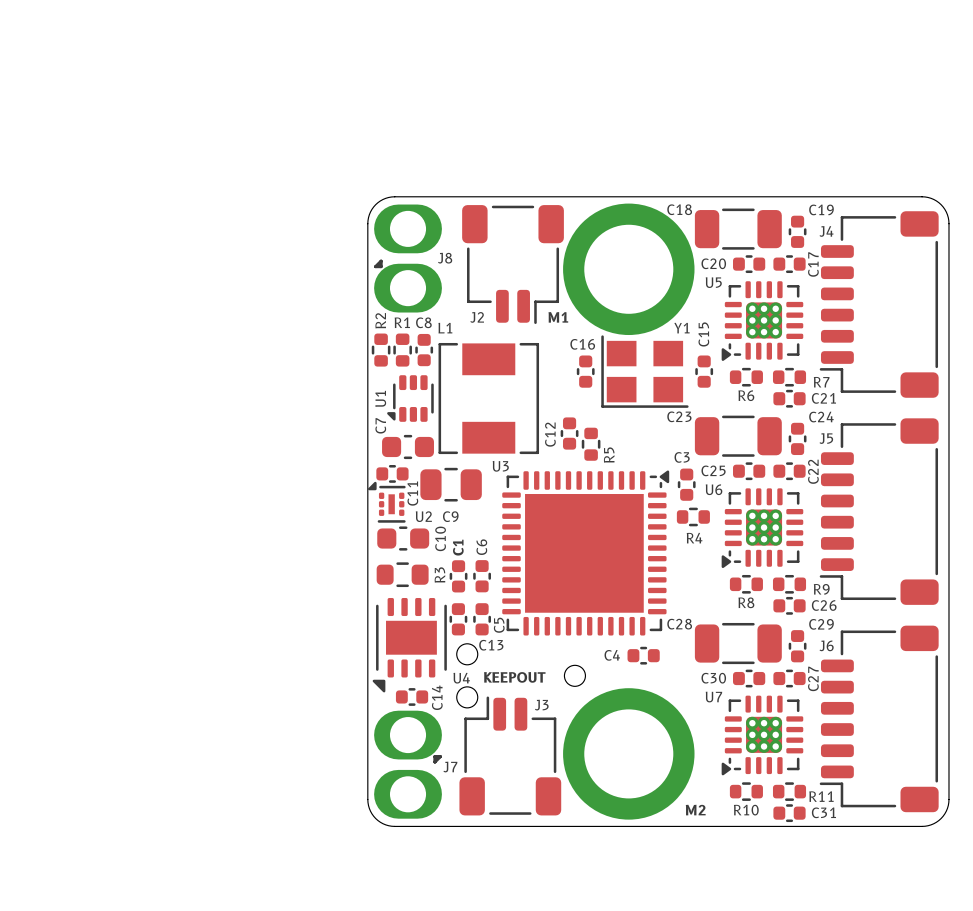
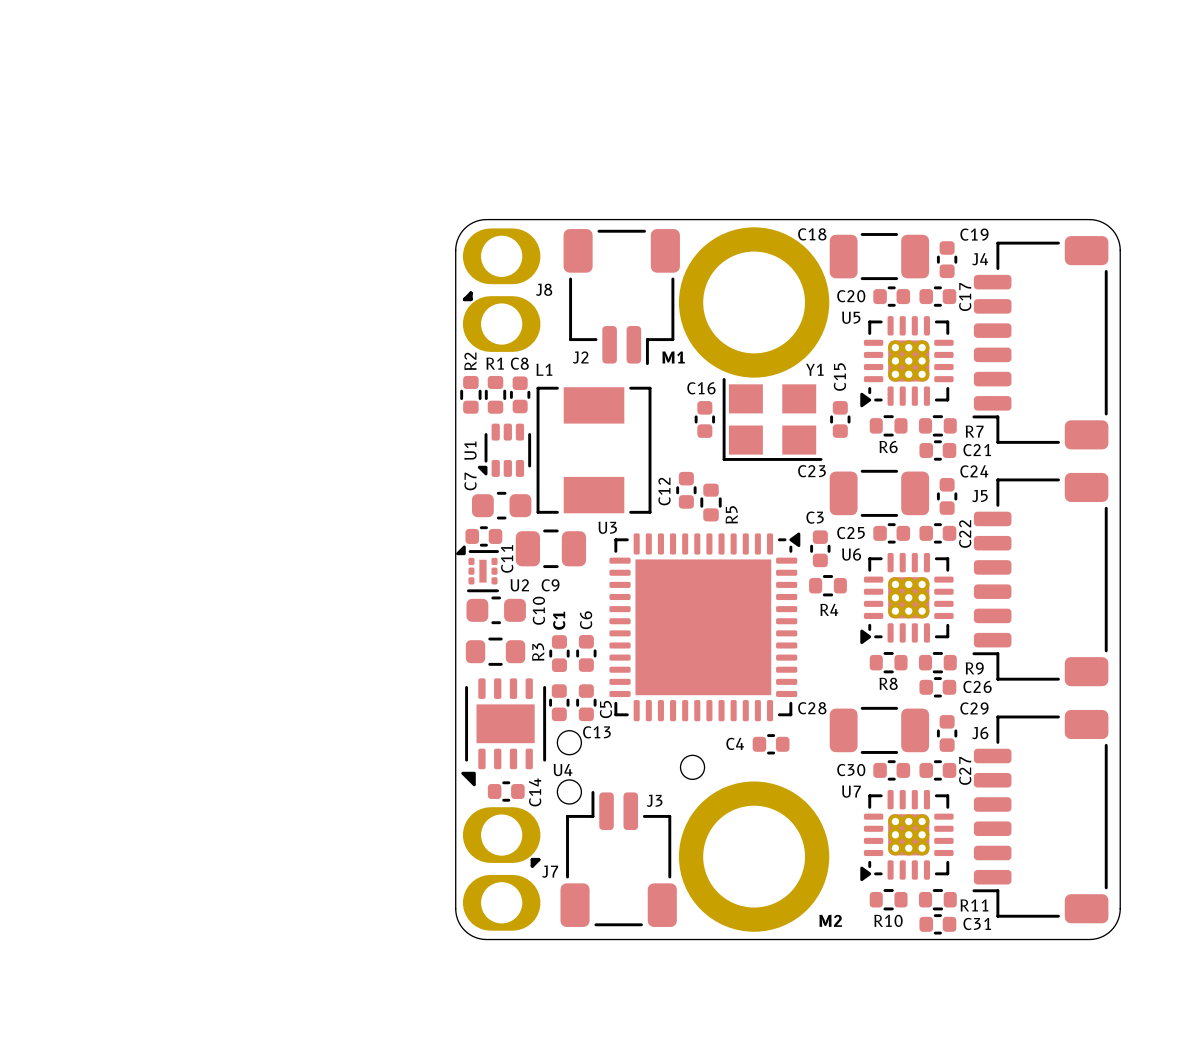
text: KEEPOUT (514, 677) -> none

